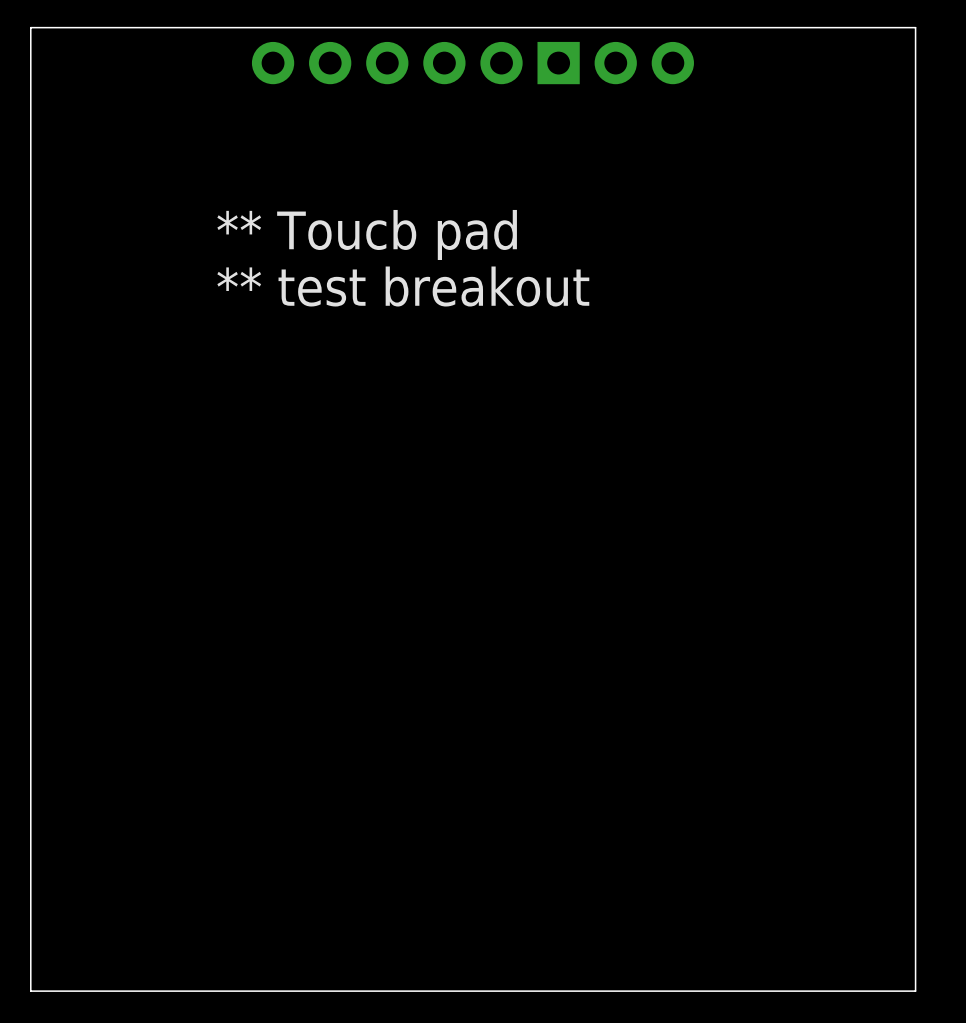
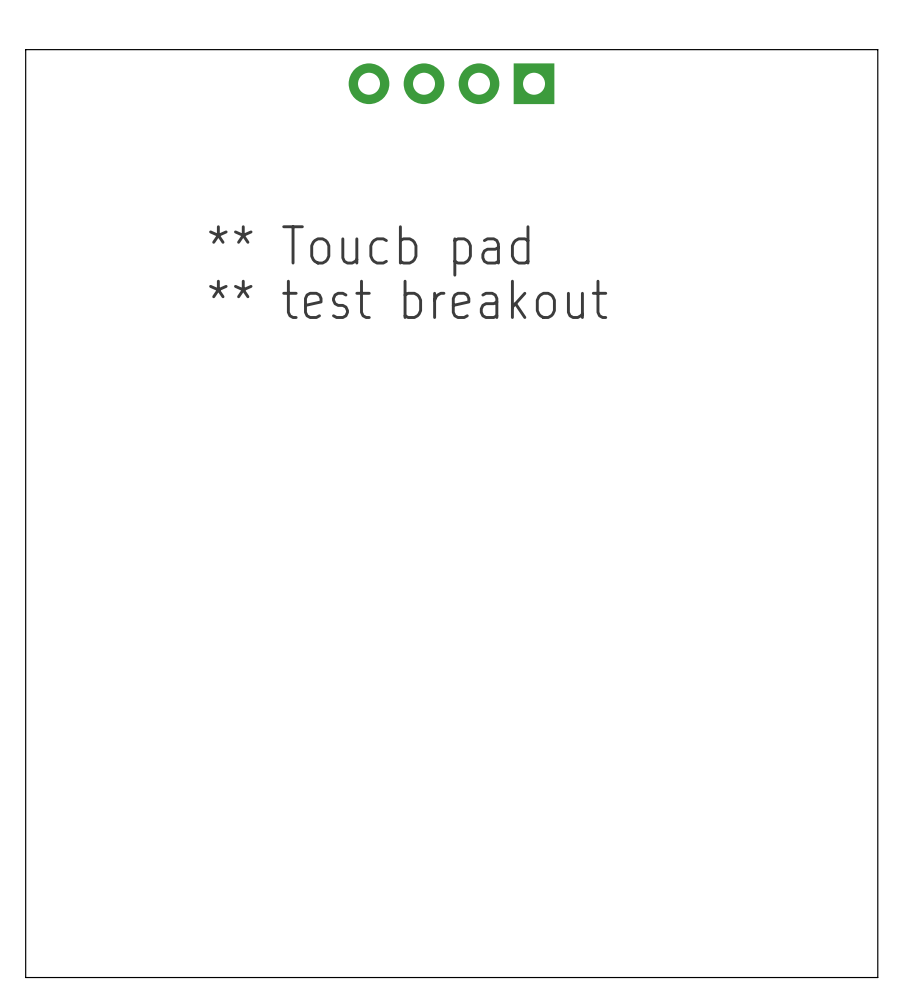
part: (301, 63) -> none
part: (644, 63) -> none

